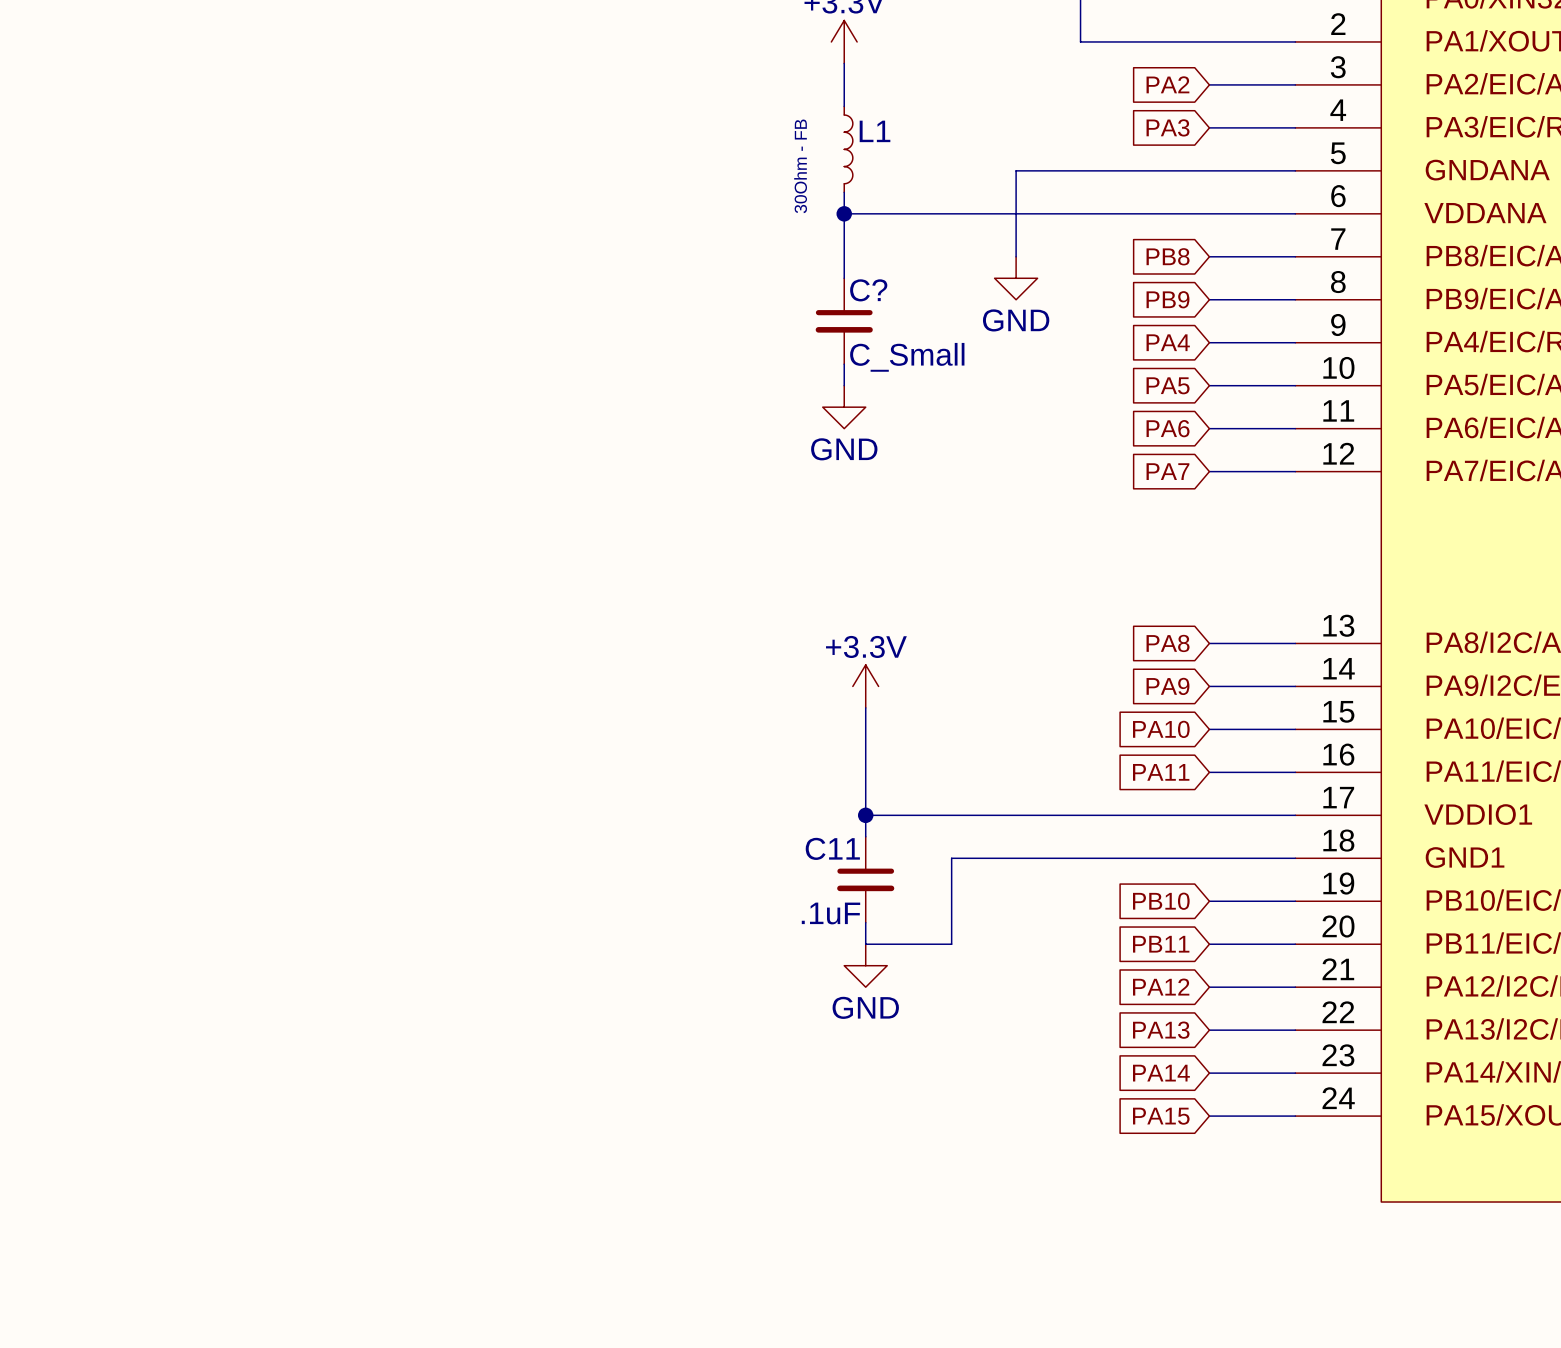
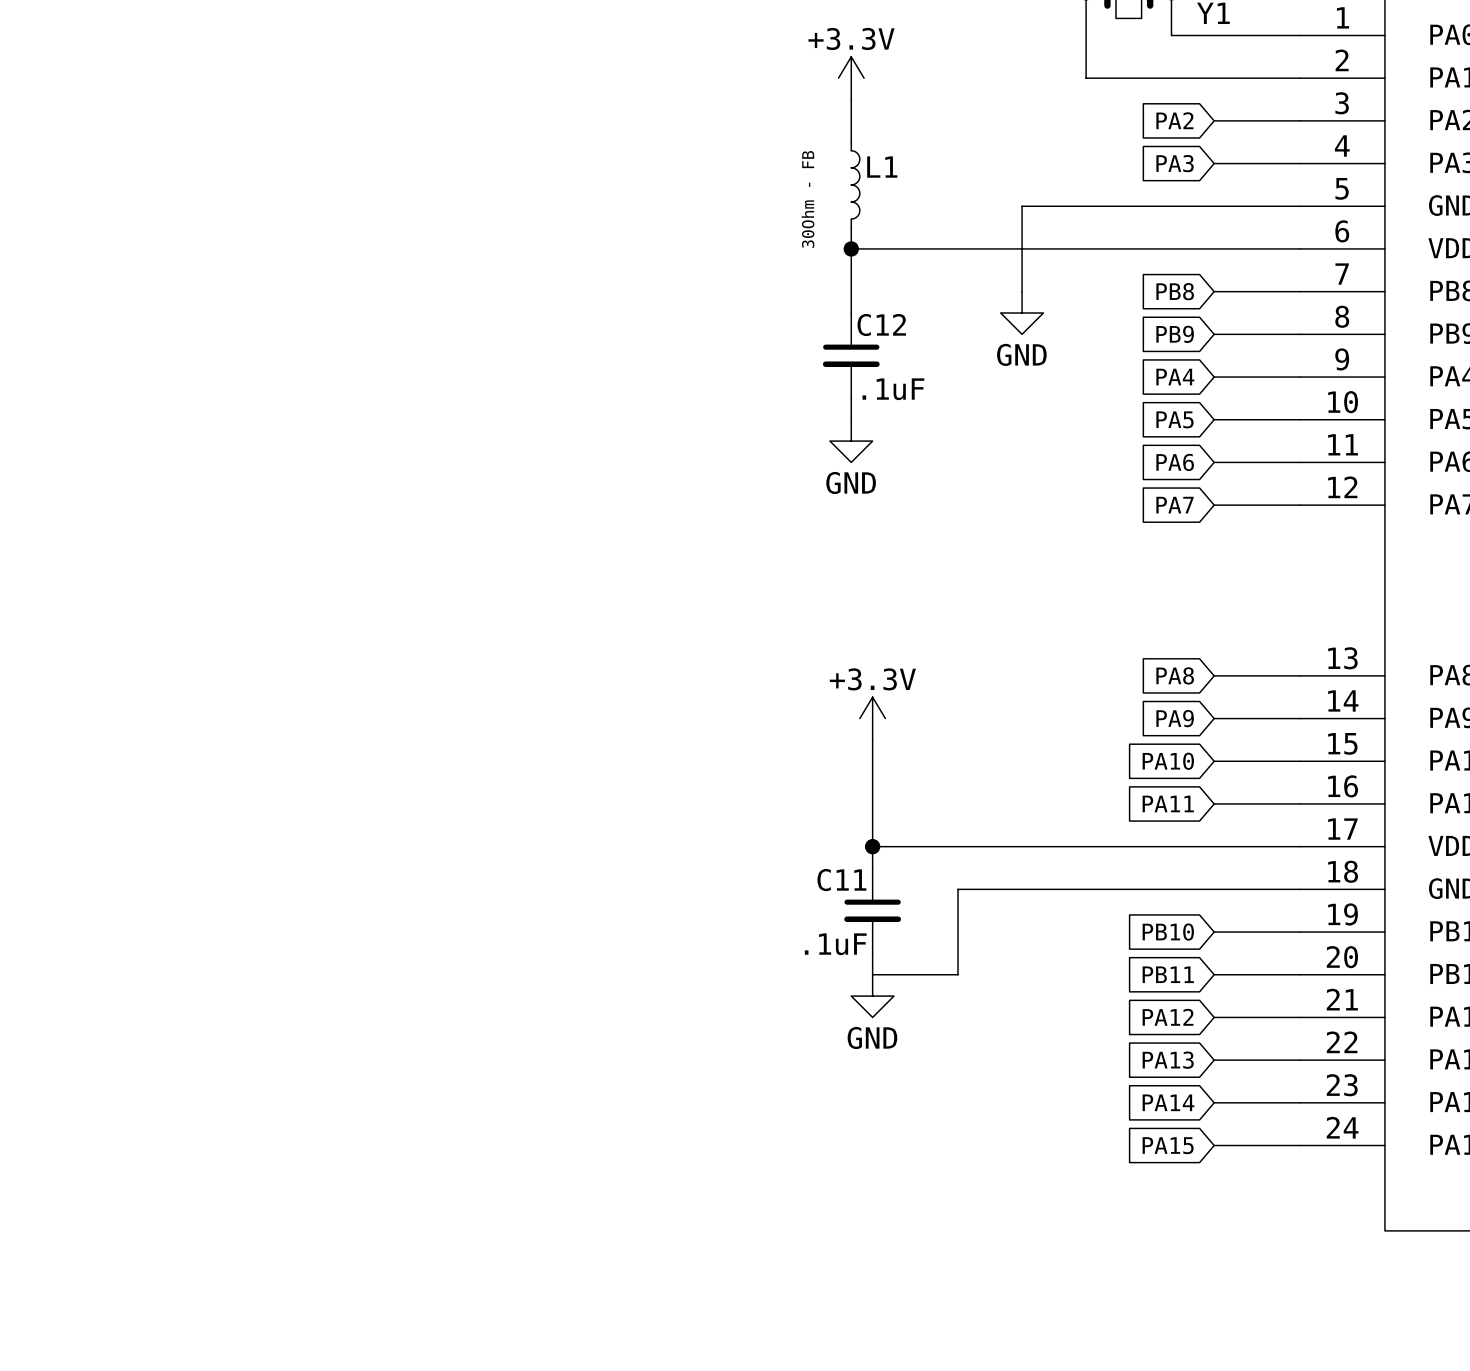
C? name: C? (868, 290) -> C12 (881, 325)
C? value: C_Small (907, 357) -> .1uF (893, 389)

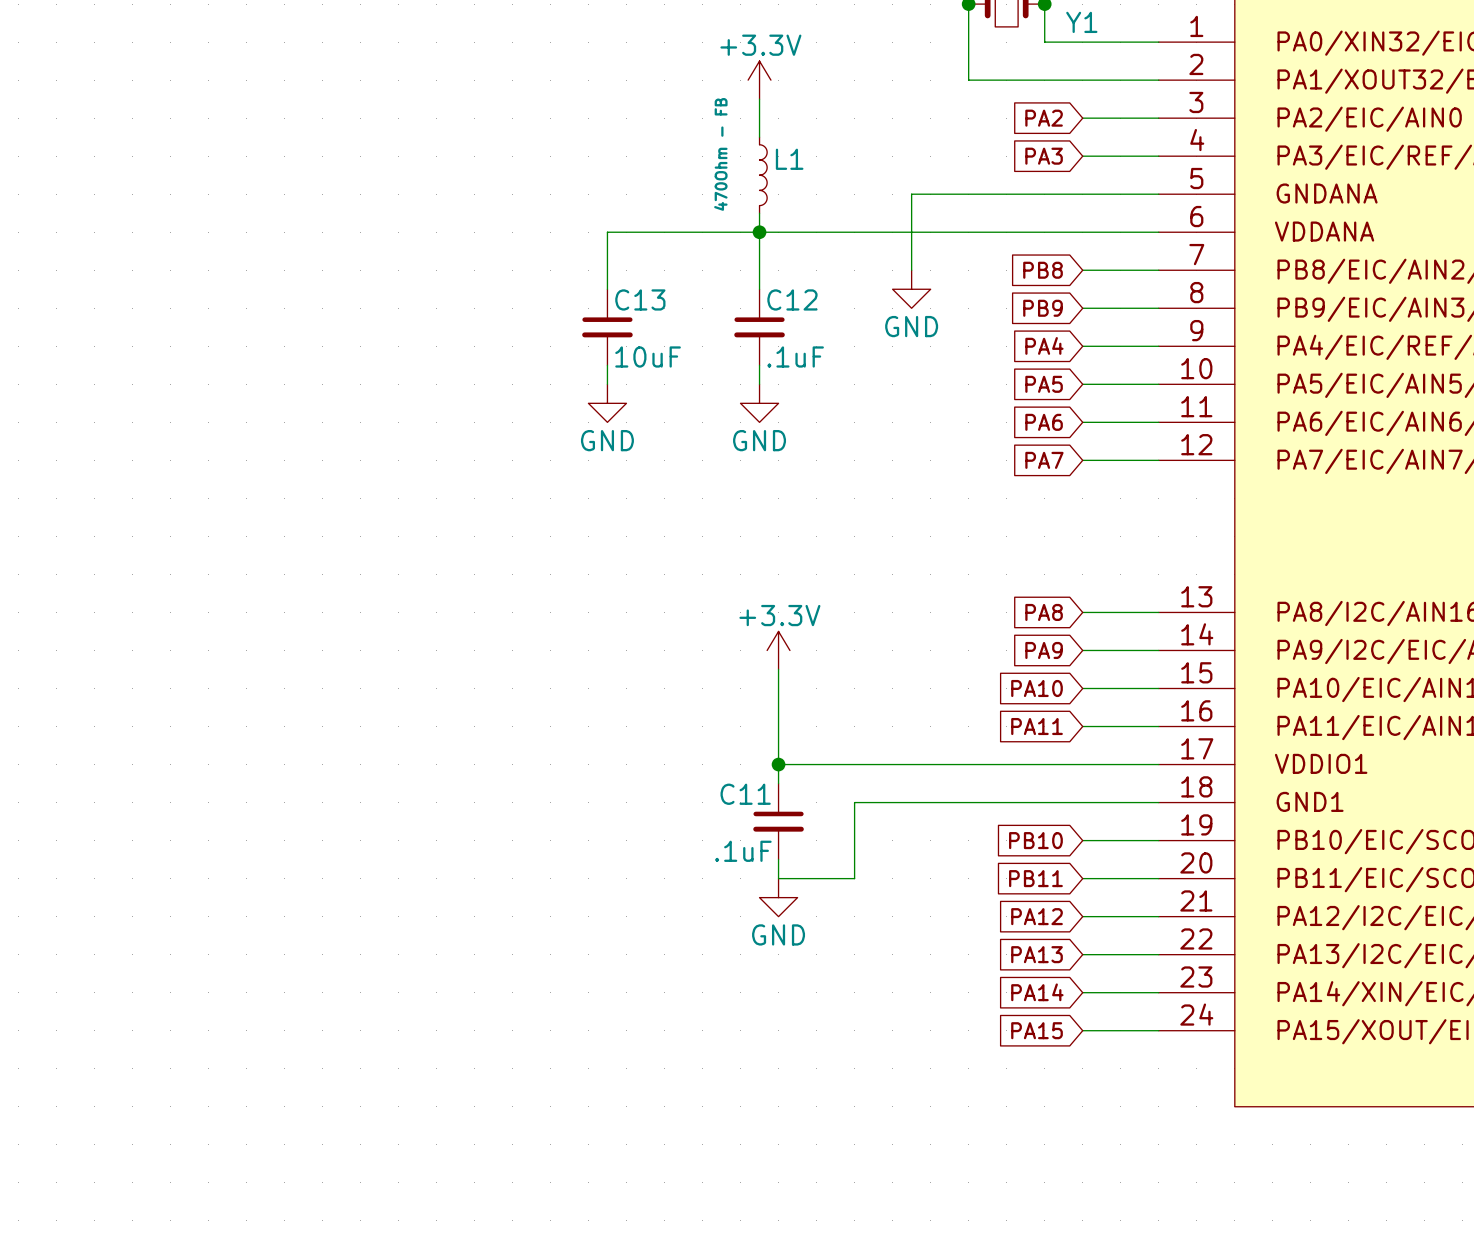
L1 value: 30Ohm - FB (808, 199) -> 470Ohm - FB (720, 154)
wire: none -> (759, 232) (607, 232) (607, 289)
C13: none -> 10uF (607, 327)
wire: none -> (607, 365) (607, 384)
power symbol: none -> GND (607, 403)

